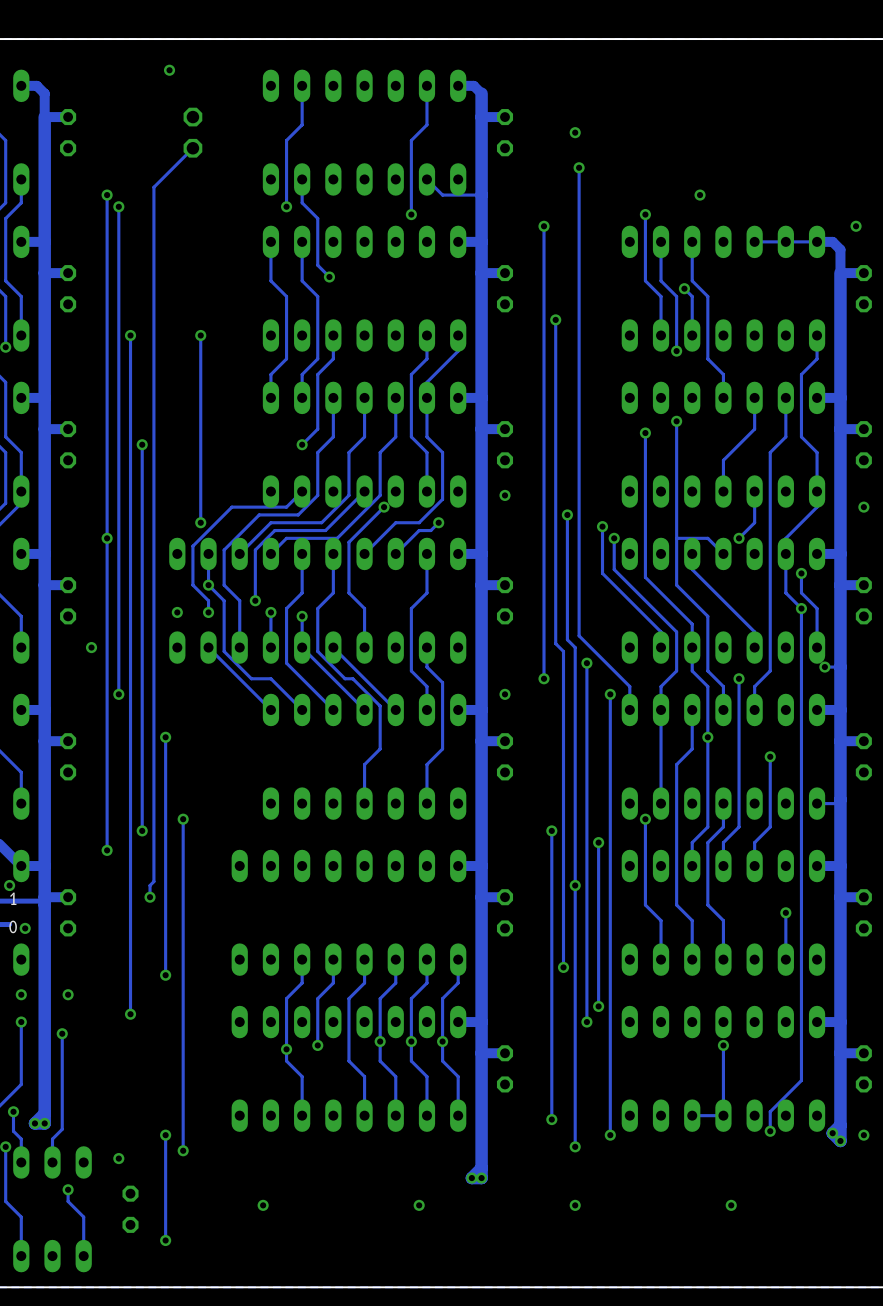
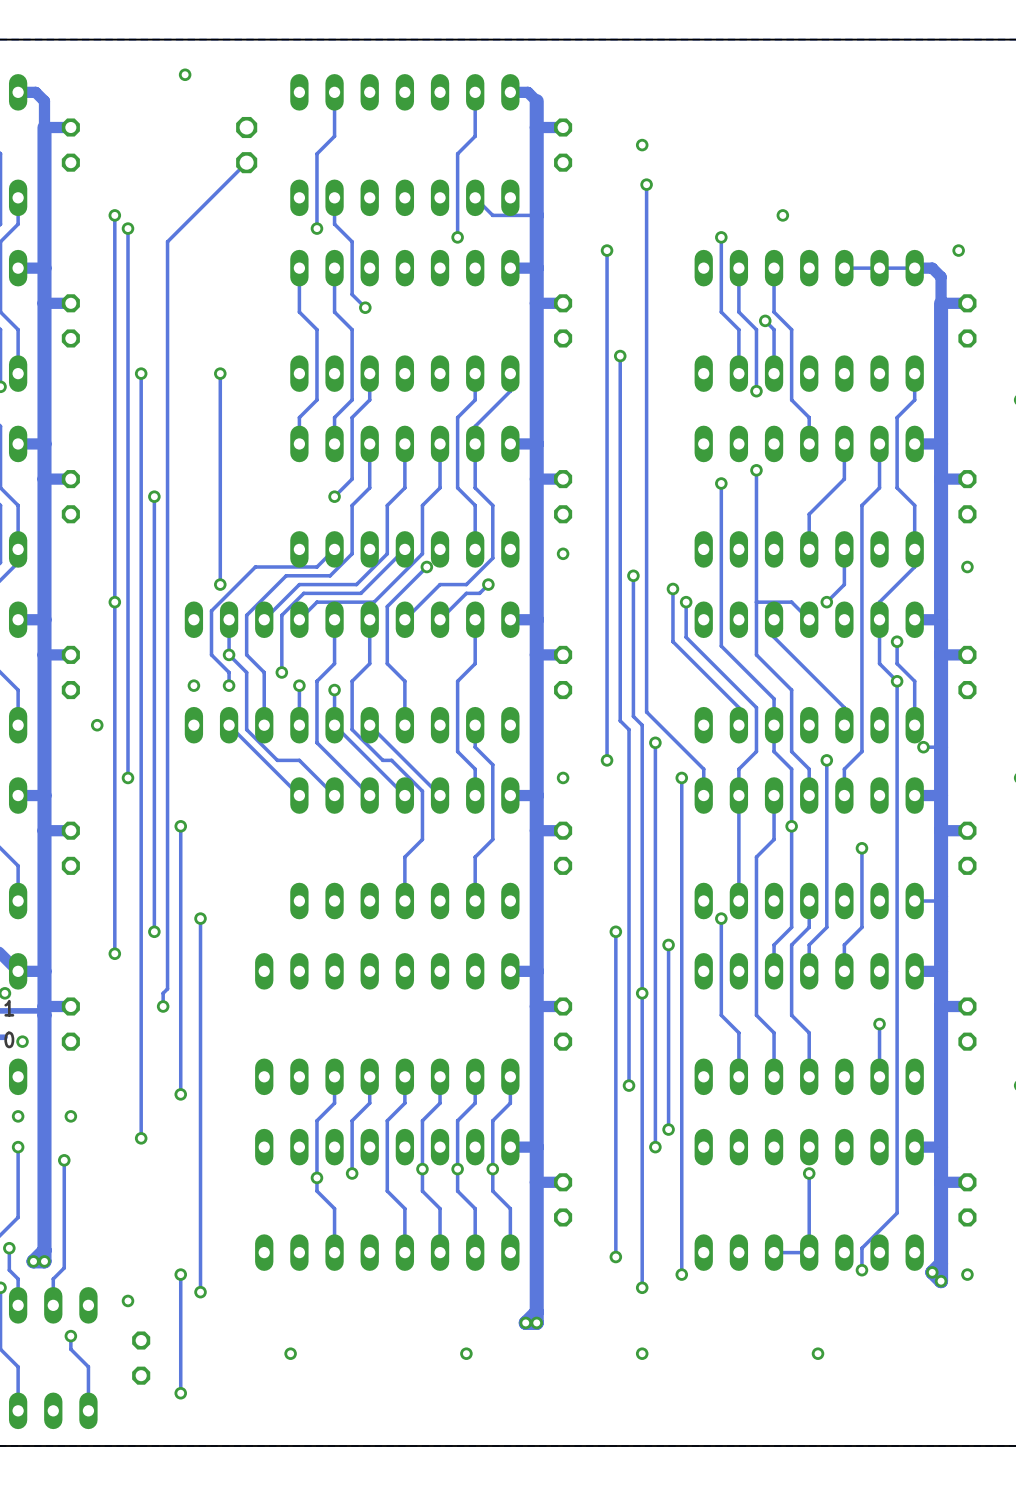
part position: (192, 132) -> (246, 145)
track: (192, 148) (153, 187) (153, 218) -> (246, 162) (167, 241)

